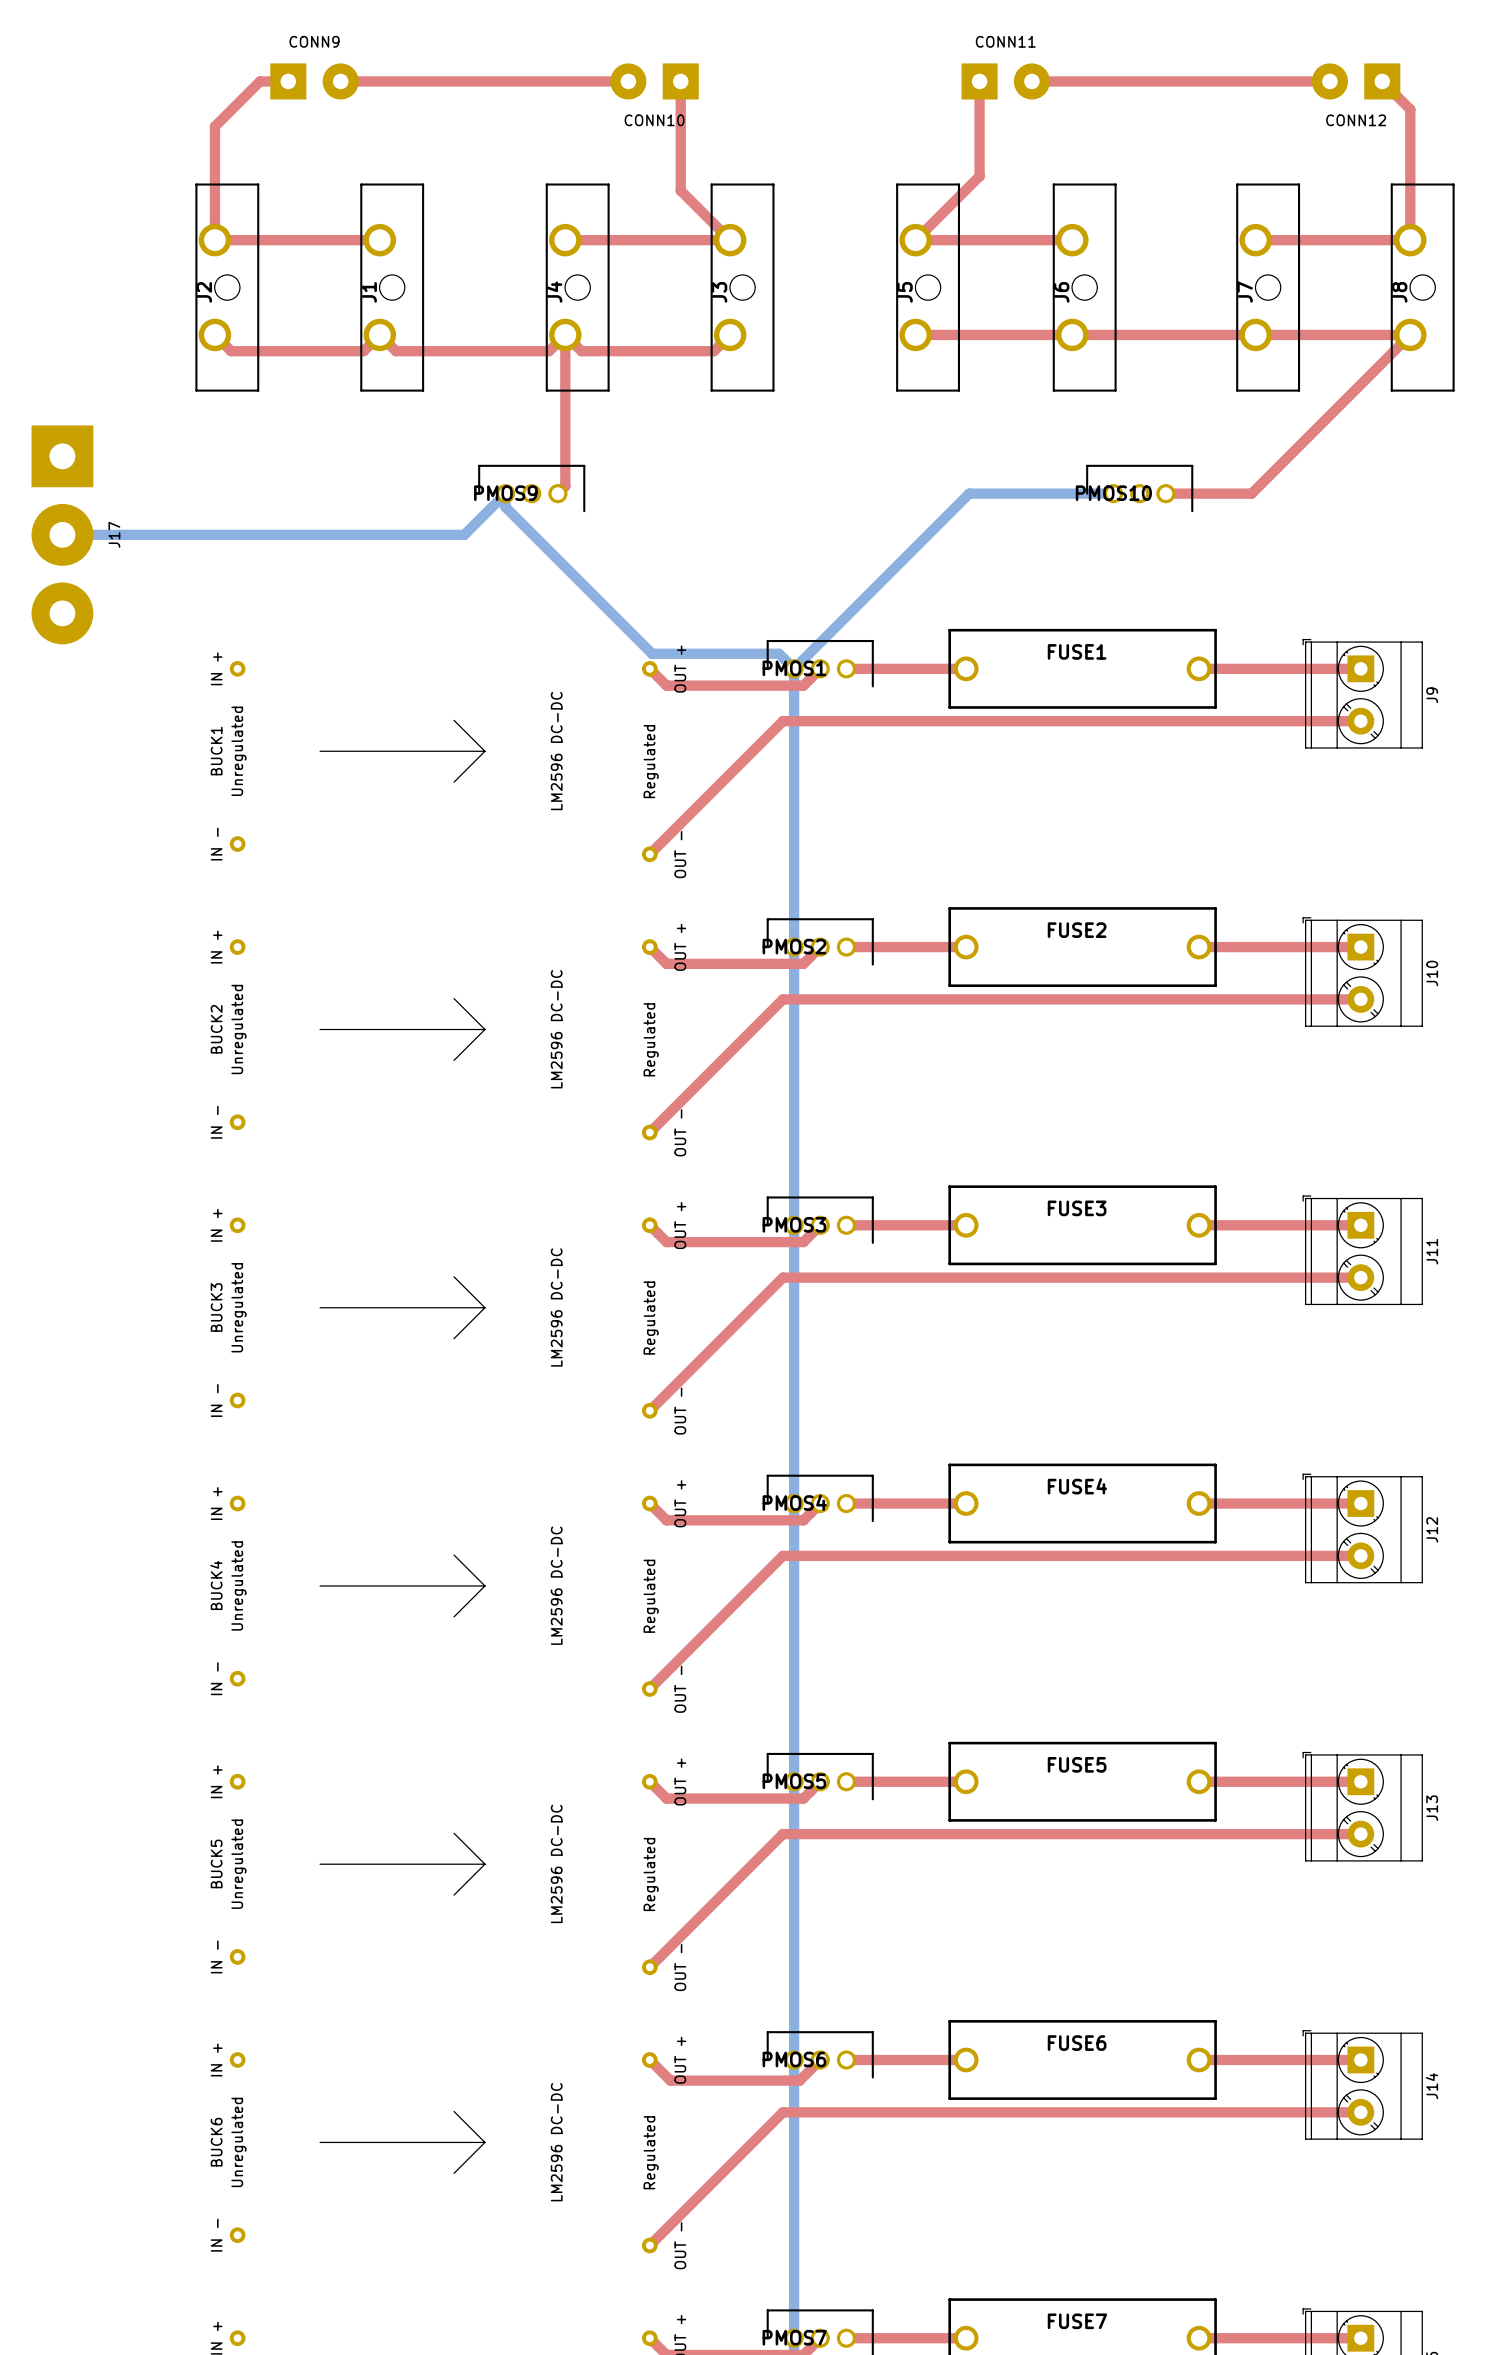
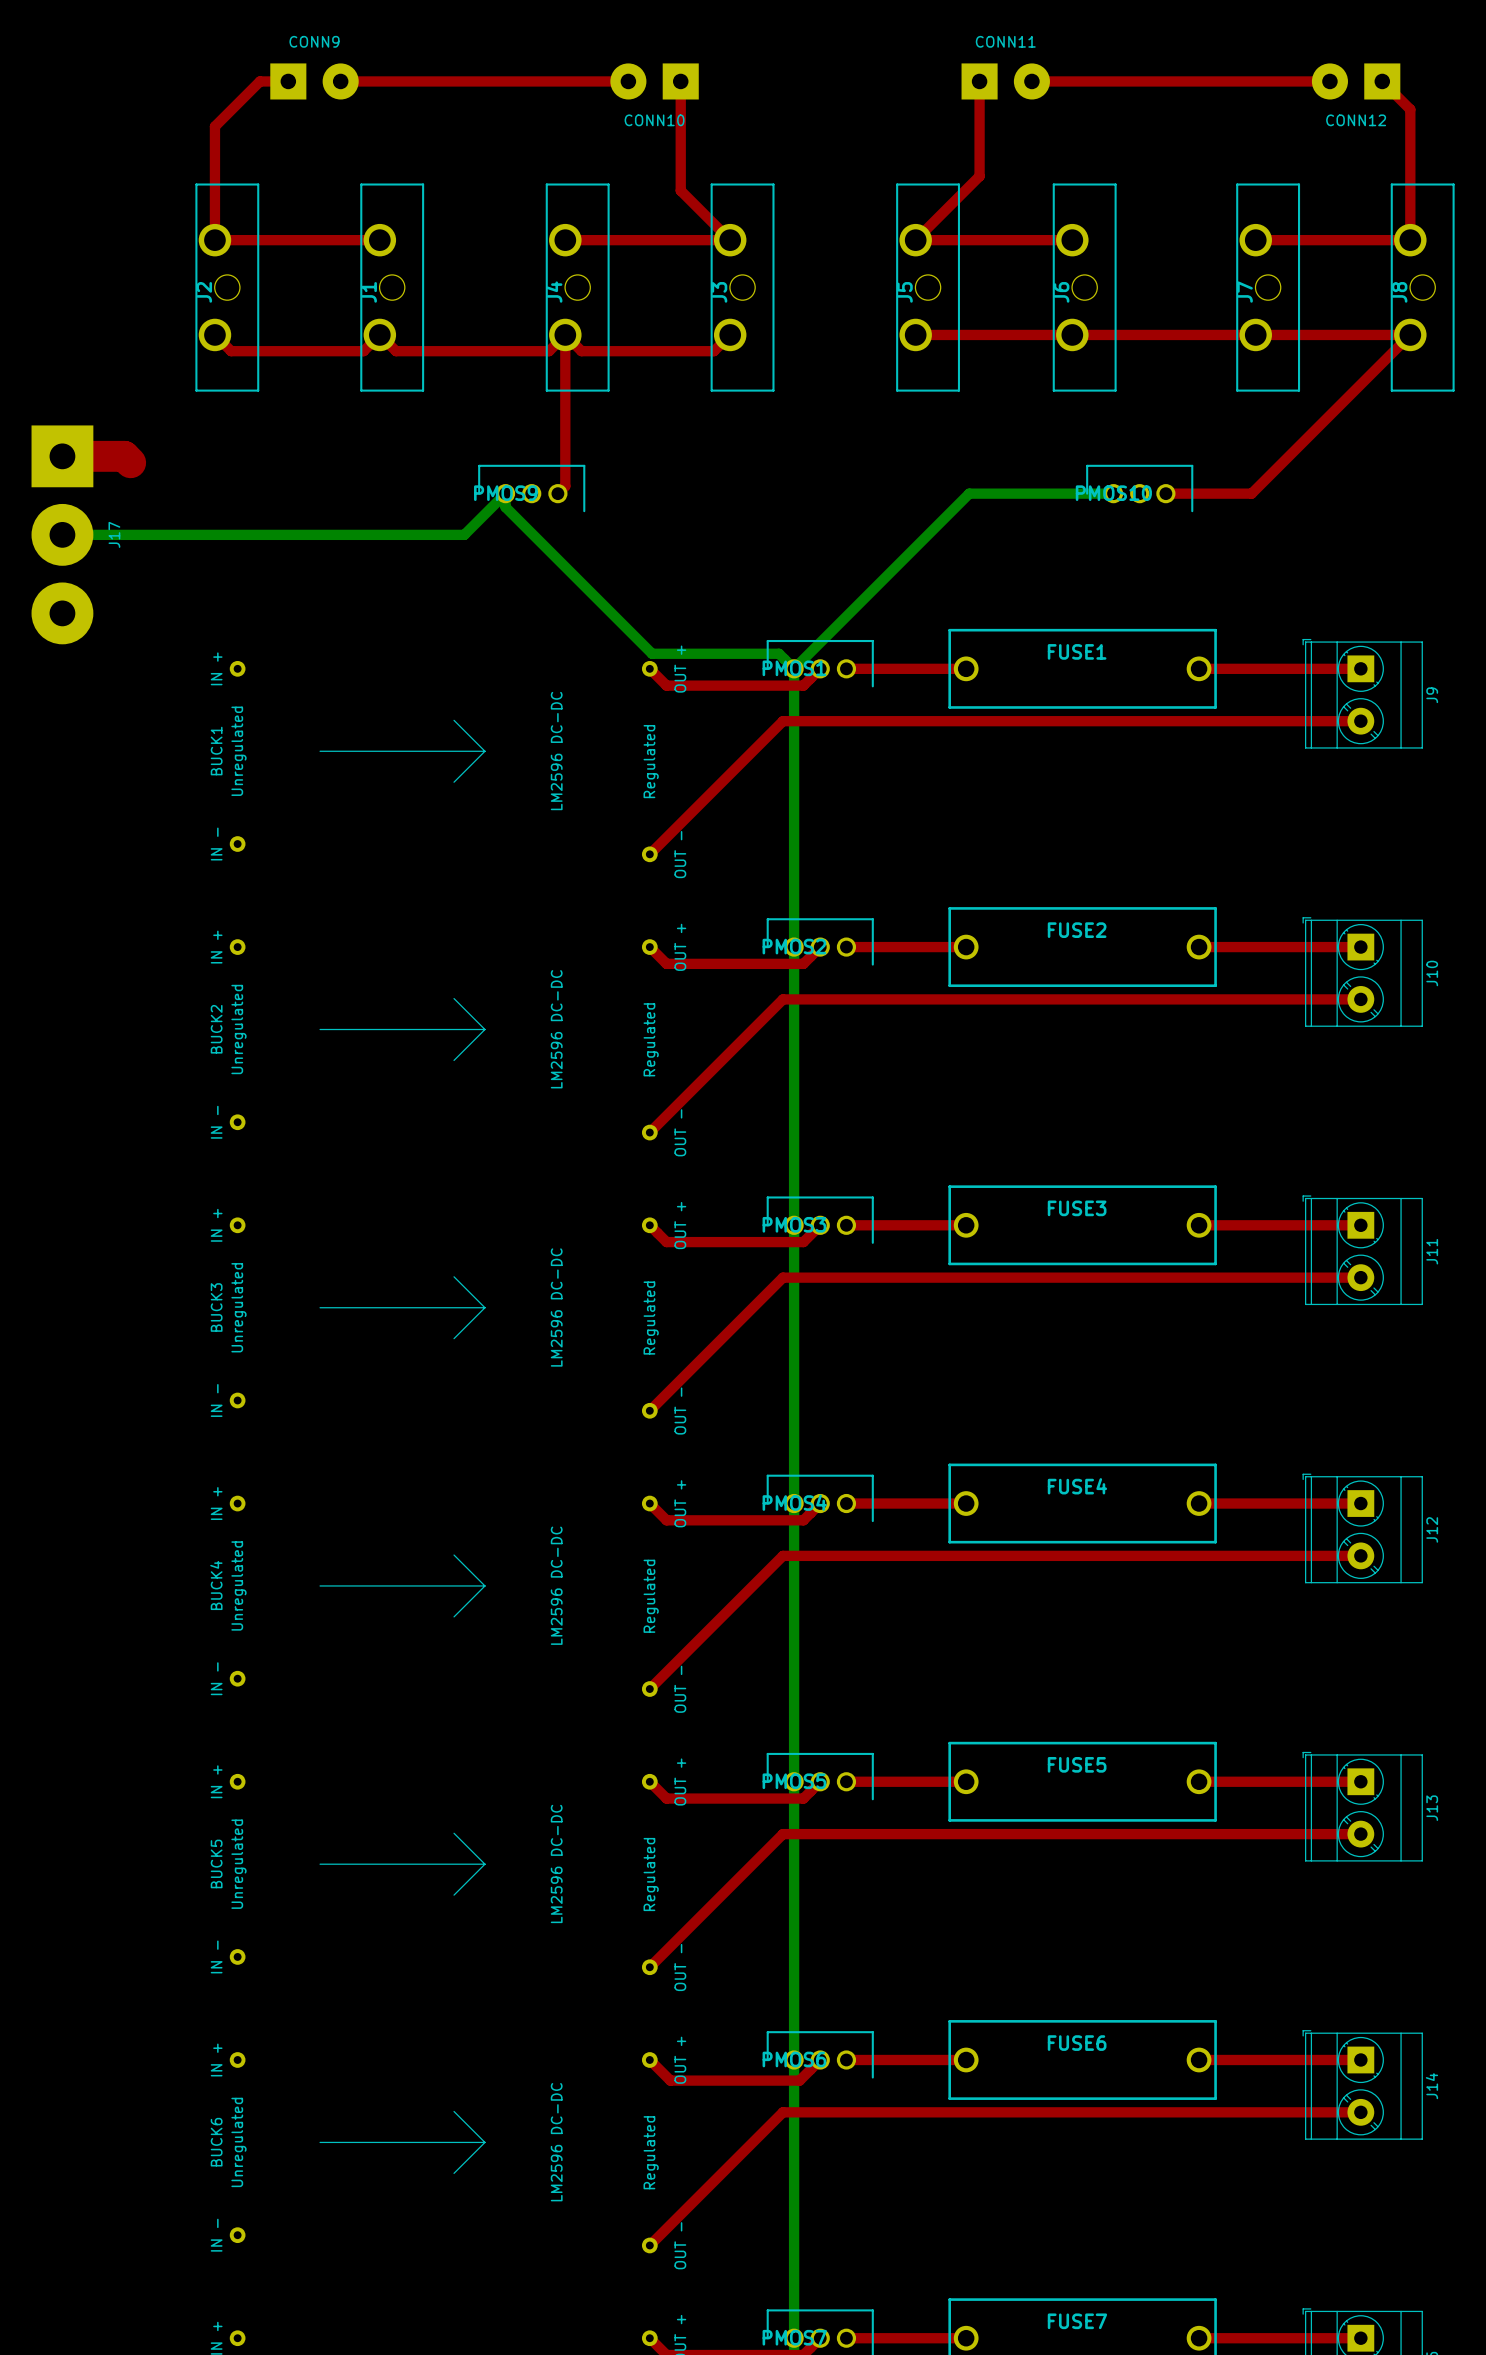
top track: none -> (62, 456) (124, 456) (130, 462)

